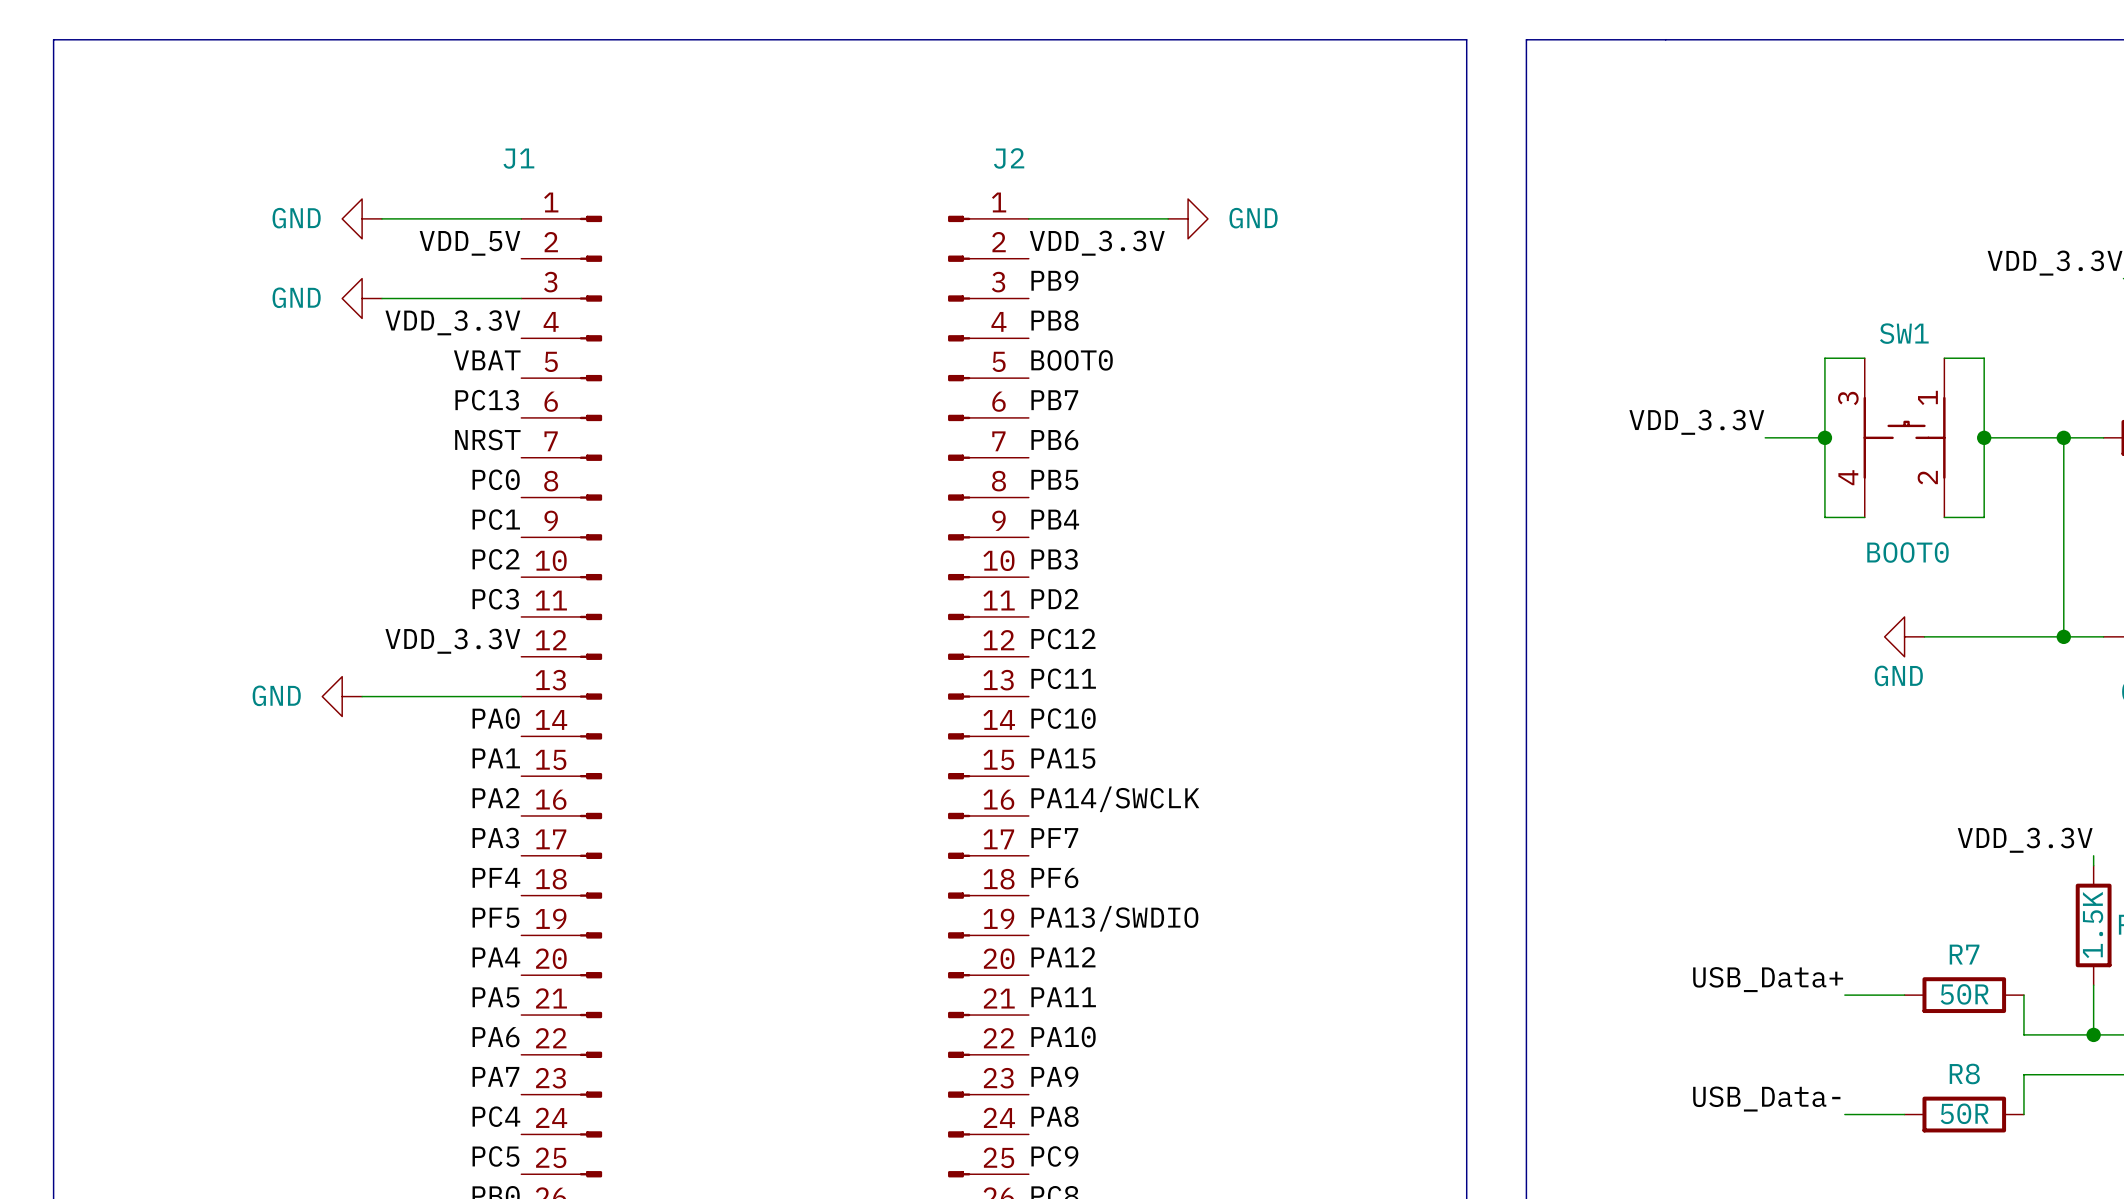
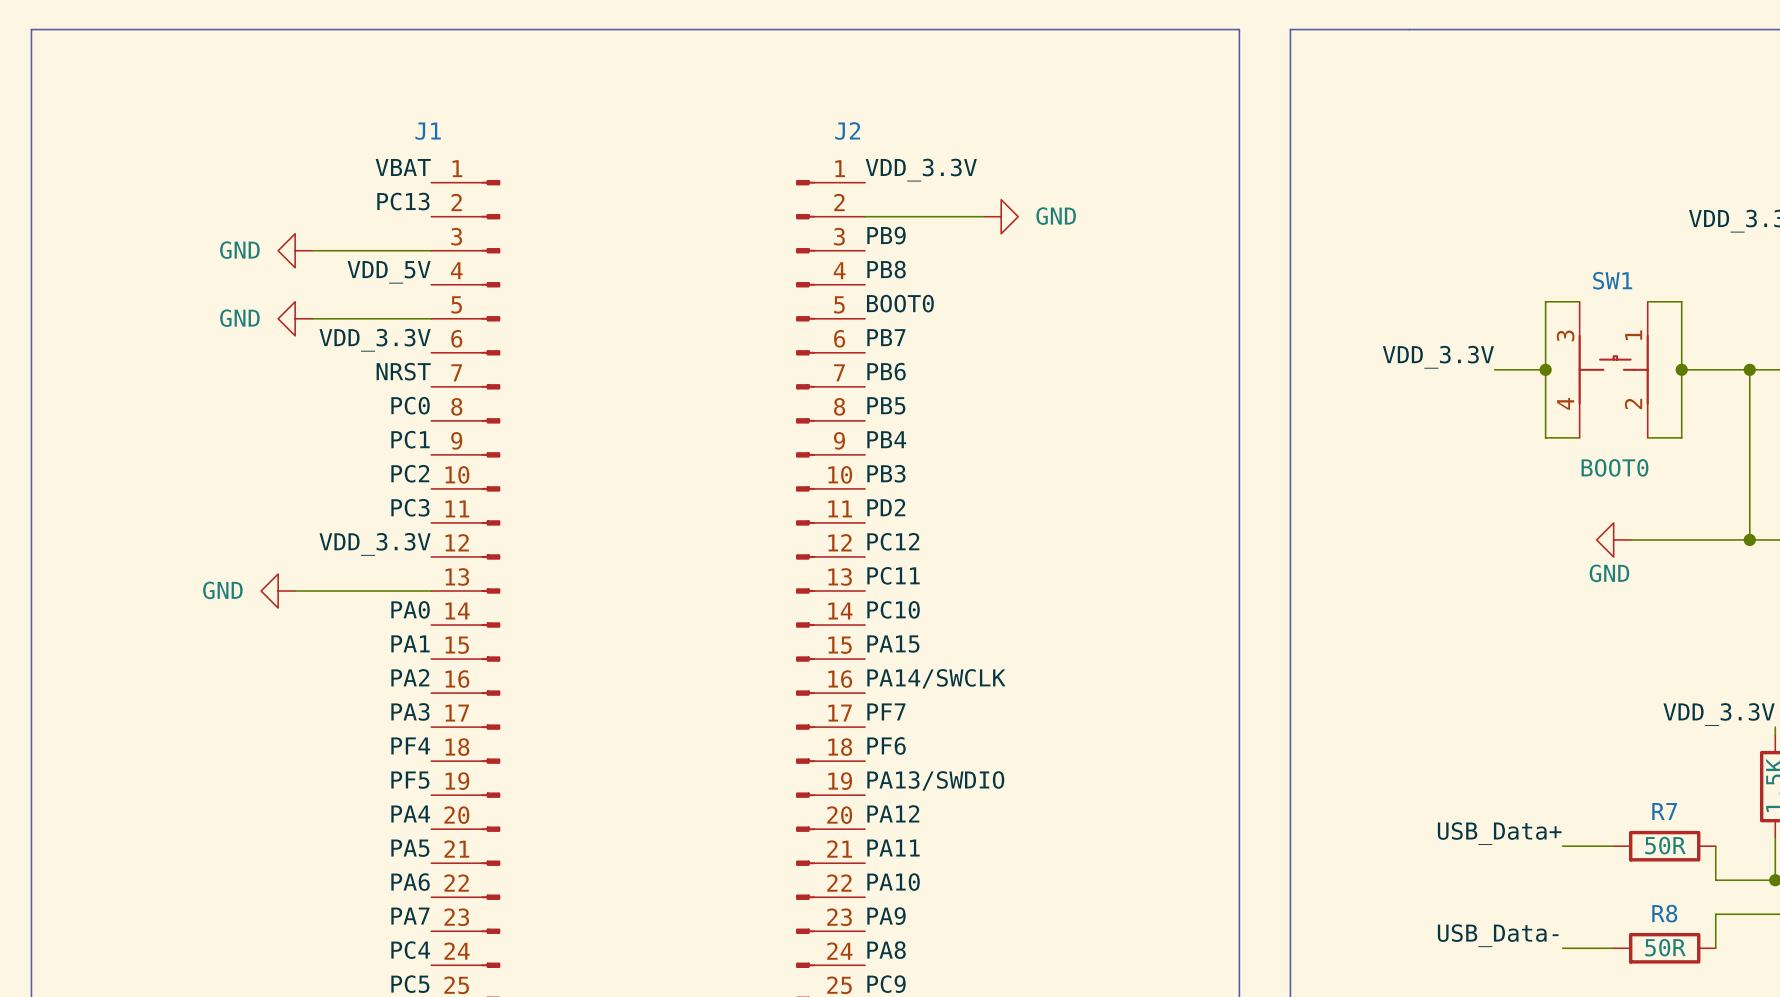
power symbol position: GND (362, 218) -> GND (295, 318)
wire: (381, 218) (521, 218) -> (312, 318) (431, 318)
wire: (1028, 218) (1168, 218) -> (865, 216) (984, 216)
power symbol position: GND (1188, 218) -> GND (1001, 216)
label: VDD_5V (469, 243) -> PC13 (403, 201)
label position: VDD_3.3V (1097, 243) -> VDD_3.3V (921, 170)
label: VDD_3.3V (452, 322) -> VDD_5V (389, 272)
label position: VBAT (487, 360) -> VBAT (403, 167)
label: PC13 (487, 400) -> VDD_3.3V (375, 340)

